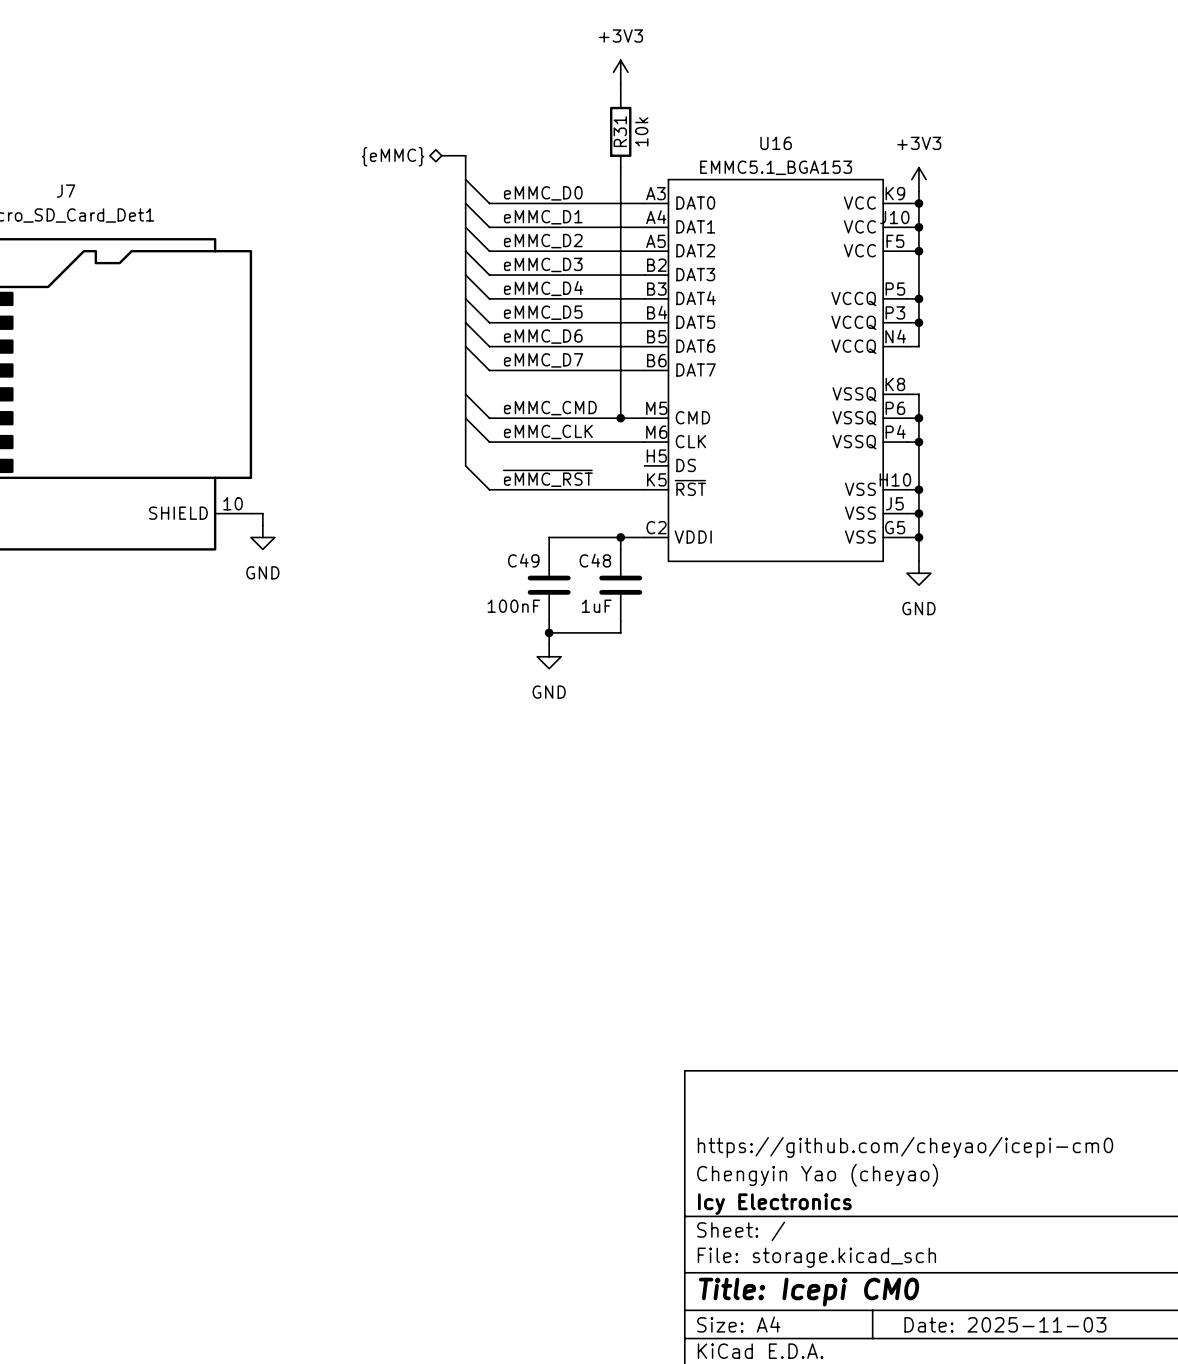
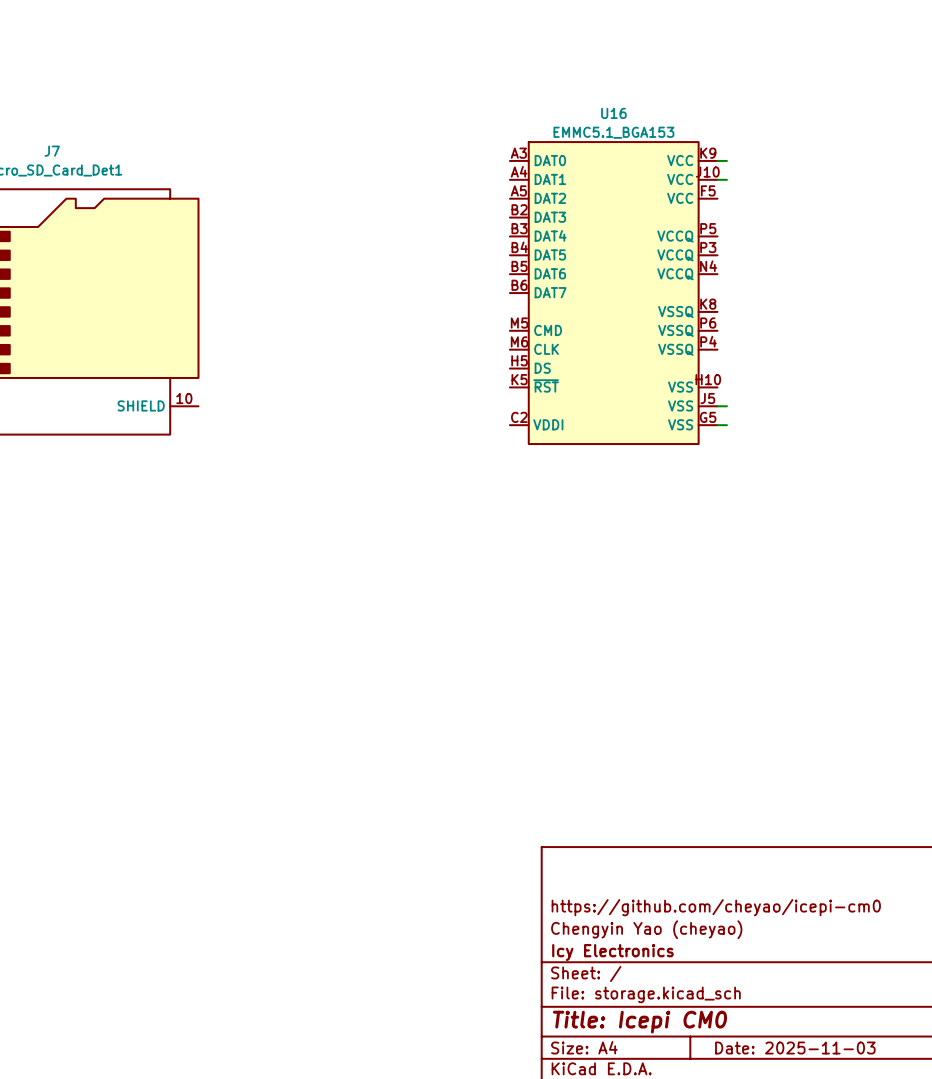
power symbol: +3V3 (620, 72) -> none
wire: (620, 84) (620, 96) -> none
R31: 10k (620, 131) -> none
bus: (441, 155) (465, 155) (465, 465) -> none
hierarchical label: {eMMC} (393, 156) -> none
wire: (620, 167) (620, 418) -> none
wire: (465, 179) (489, 203) (644, 203) -> none
power symbol: +3V3 (918, 179) -> none
wire: (918, 191) (918, 346) (907, 346) -> none
label: eMMC_D0 (543, 193) -> none
wire: (465, 203) (489, 227) (644, 227) -> none
junction: (918, 203) -> none
label: eMMC_D1 (543, 217) -> none
wire: (465, 227) (489, 251) (644, 251) -> none
junction: (918, 227) -> none
label: eMMC_D2 (543, 241) -> none
wire: (465, 251) (489, 275) (644, 275) -> none
wire: (907, 251) (918, 251) -> none
junction: (918, 251) -> none
label: eMMC_D3 (543, 264) -> none
wire: (465, 275) (489, 298) (644, 298) -> none
label: eMMC_D4 (543, 288) -> none
wire: (465, 298) (489, 322) (644, 322) -> none
wire: (907, 298) (918, 298) -> none
junction: (918, 298) -> none
label: eMMC_D5 (543, 312) -> none
wire: (465, 322) (489, 346) (644, 346) -> none
wire: (907, 322) (918, 322) -> none
junction: (918, 322) -> none
label: eMMC_D6 (543, 336) -> none
wire: (465, 346) (489, 370) (644, 370) -> none
label: eMMC_D7 (543, 360) -> none
wire: (465, 394) (489, 418) (644, 418) -> none
wire: (907, 394) (918, 394) (918, 561) -> none
label: eMMC_CMD (550, 408) -> none
wire: (465, 418) (489, 442) (644, 442) -> none
junction: (620, 418) -> none
wire: (907, 418) (918, 418) -> none
junction: (918, 418) -> none
label: eMMC_CLK (548, 431) -> none
wire: (907, 442) (918, 442) -> none
junction: (918, 442) -> none
wire: (465, 465) (489, 489) (644, 489) -> none
label: ~{eMMC_RST} (547, 478) -> none
wire: (907, 489) (918, 489) -> none
junction: (918, 489) -> none
wire: (250, 513) (262, 513) (262, 525) -> none
junction: (918, 513) -> none
power symbol: GND (262, 537) -> none
wire: (620, 537) (620, 549) -> none
junction: (620, 537) -> none
wire: (644, 537) (549, 537) (549, 549) -> none
junction: (918, 537) -> none
power symbol: GND (918, 573) -> none
C49: 100nF (549, 585) -> none
C48: 1uF (620, 585) -> none
wire: (549, 620) (549, 644) -> none
wire: (620, 620) (620, 632) (549, 632) -> none
junction: (549, 632) -> none
power symbol: GND (549, 656) -> none

